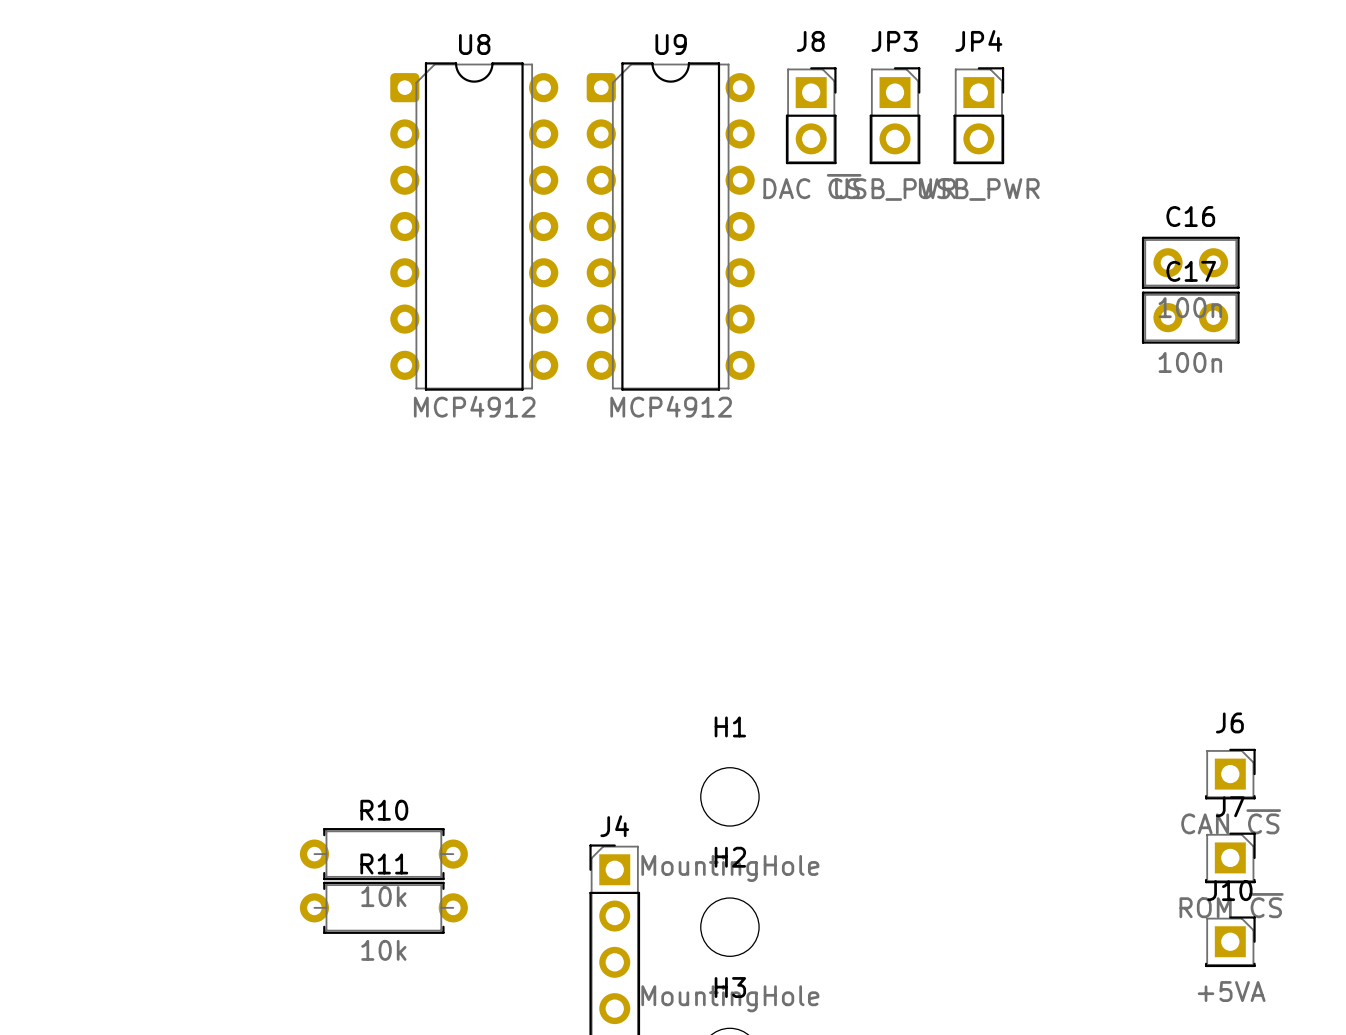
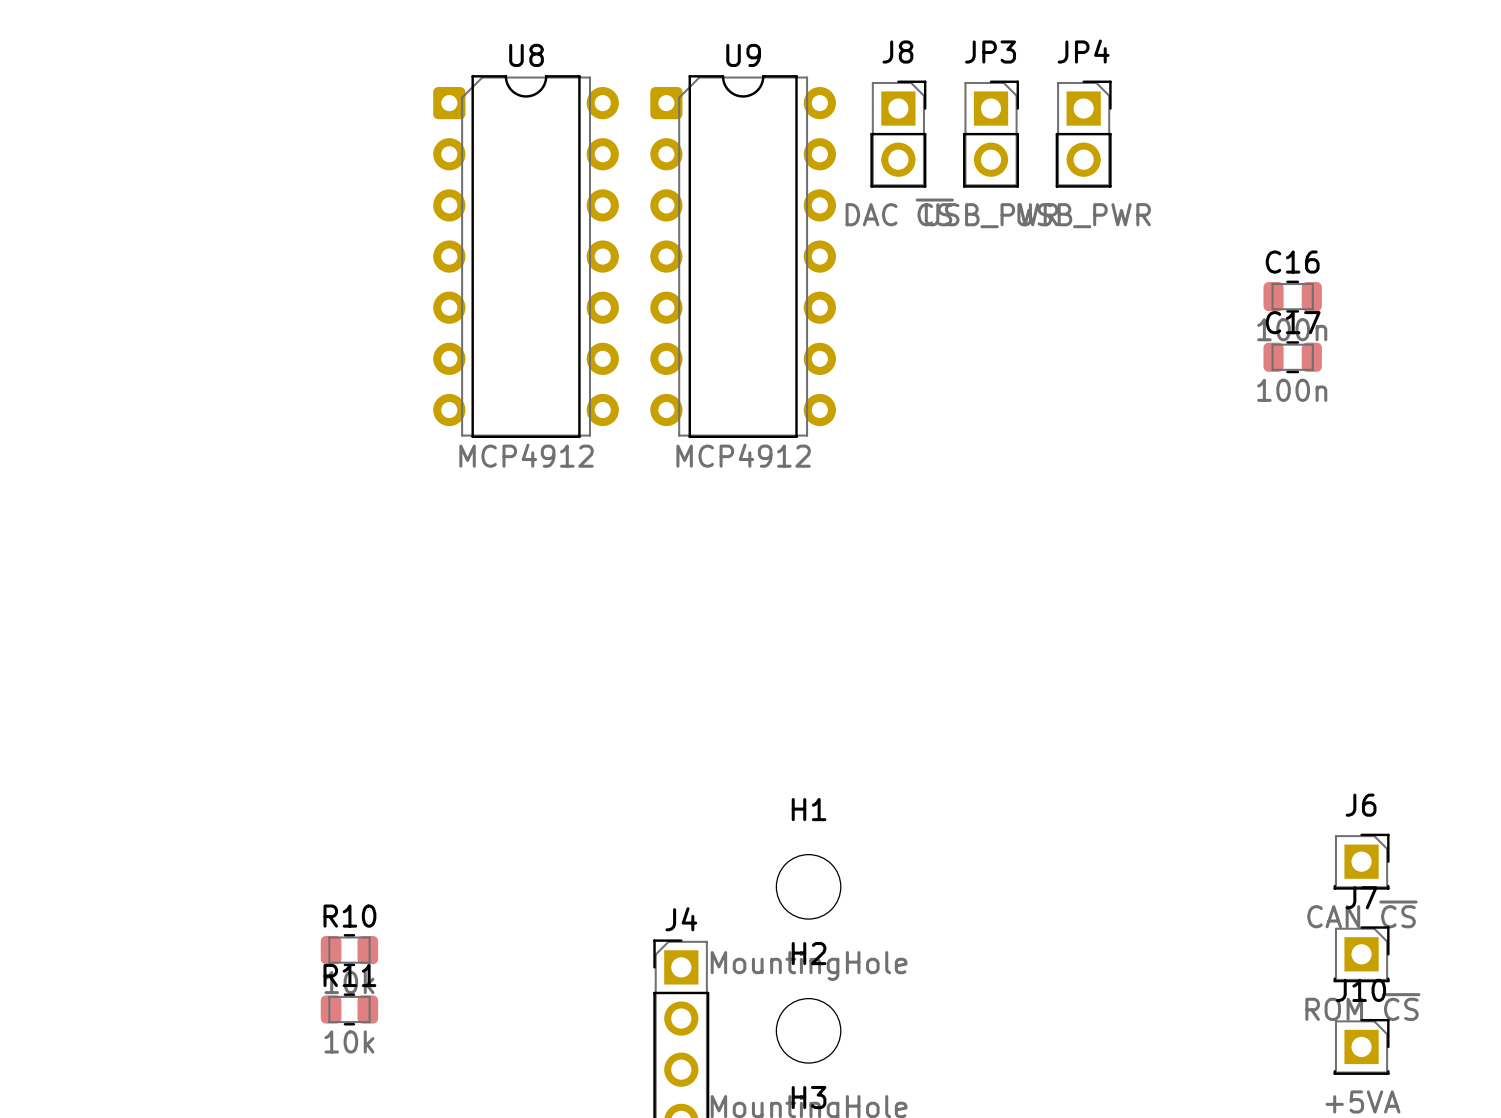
C16 footprint: [1141, 236, 1240, 289] -> [1263, 280, 1322, 313]
C17 footprint: [1141, 291, 1240, 344] -> [1263, 341, 1322, 374]
R10 footprint: [299, 828, 468, 881] -> [320, 934, 379, 967]
R11 footprint: [299, 881, 468, 934] -> [320, 993, 379, 1026]

